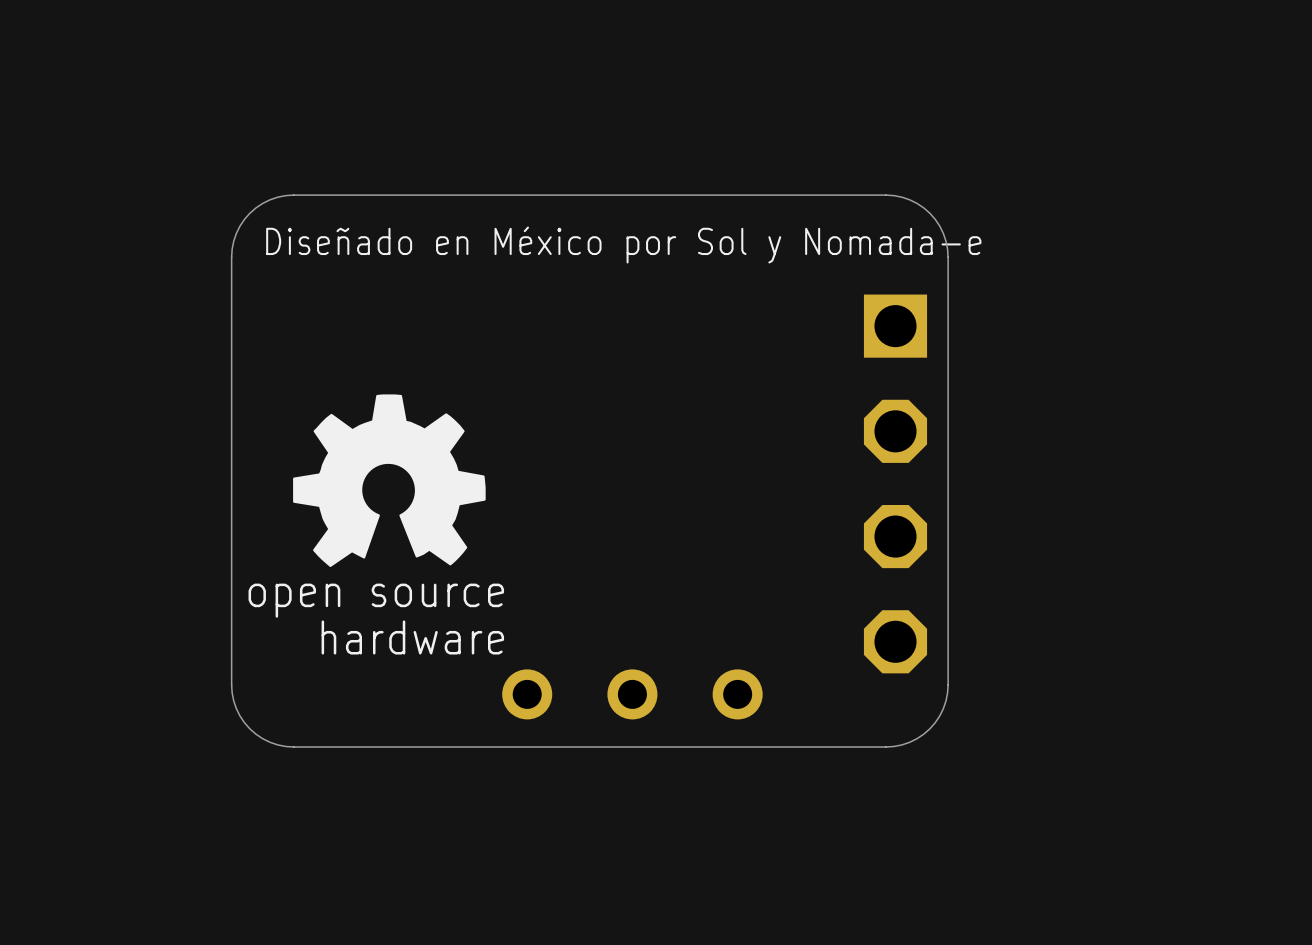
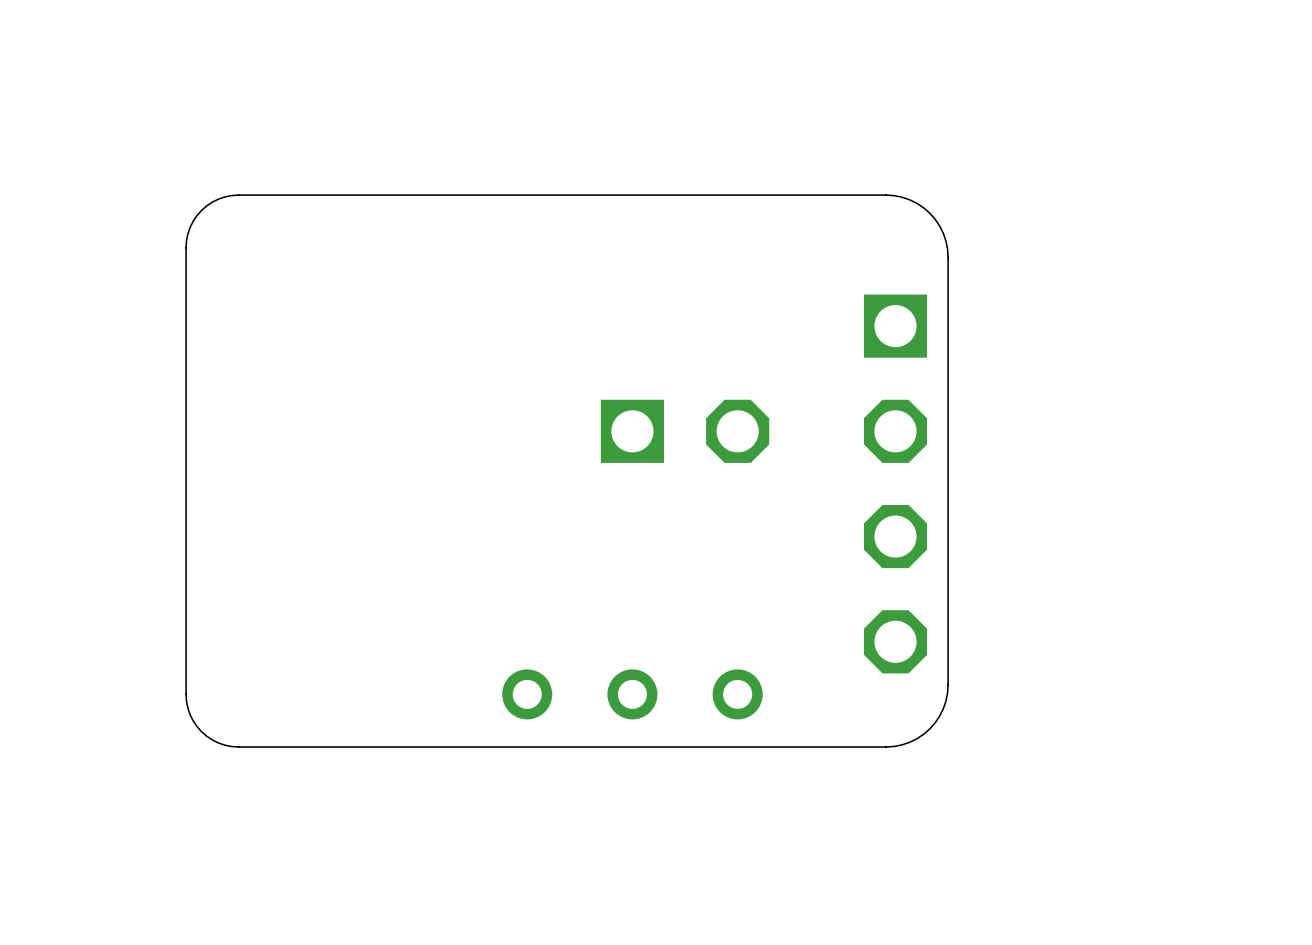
board edge: (293, 195) (269, 199) (249, 213) (236, 233) (231, 257) (232, 692) (236, 708) (249, 728) (269, 742) (293, 747) -> (293, 195) (238, 195) (218, 199) (206, 205) (193, 221) (187, 234) (186, 247) (186, 694) (187, 708) (196, 726) (206, 736) (218, 743) (238, 747) (293, 747)
text: Diseñado en México por Sol y Nomada-e (623, 245) -> none
drawing: [293, 394, 486, 567] -> none
part: none -> (685, 431)

